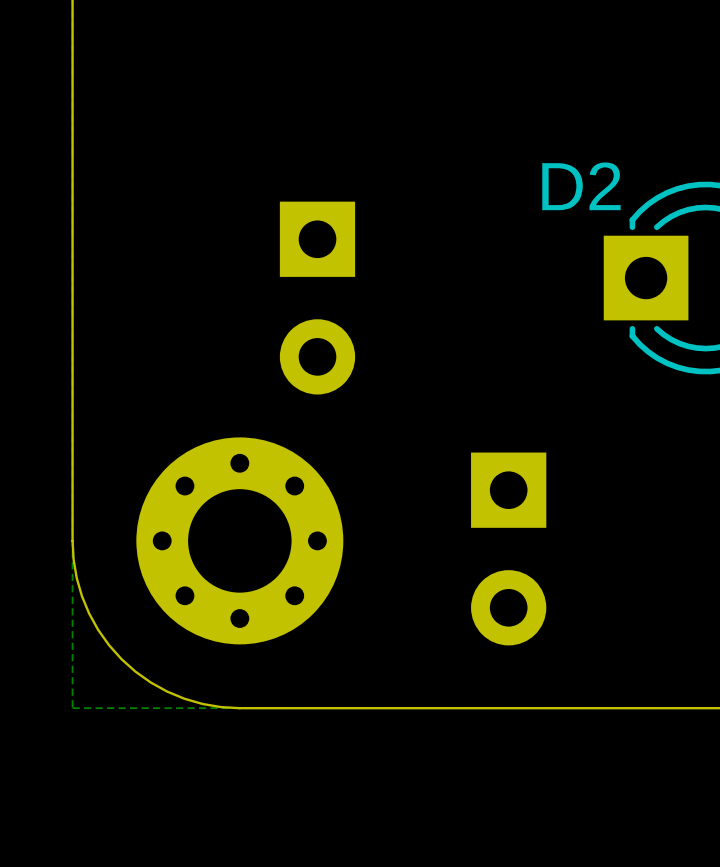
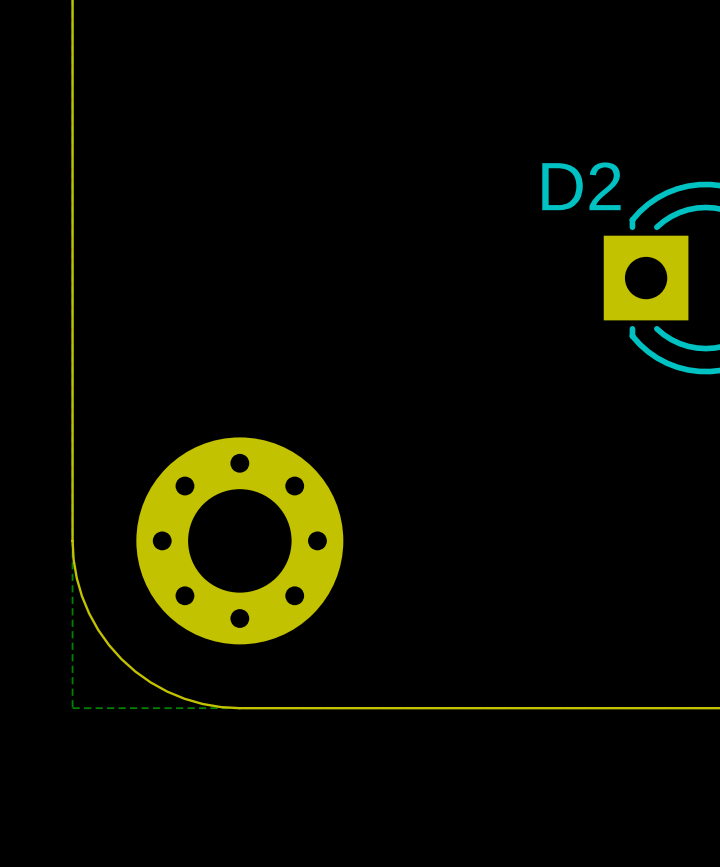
part: (317, 298) -> none
part: (508, 548) -> none

